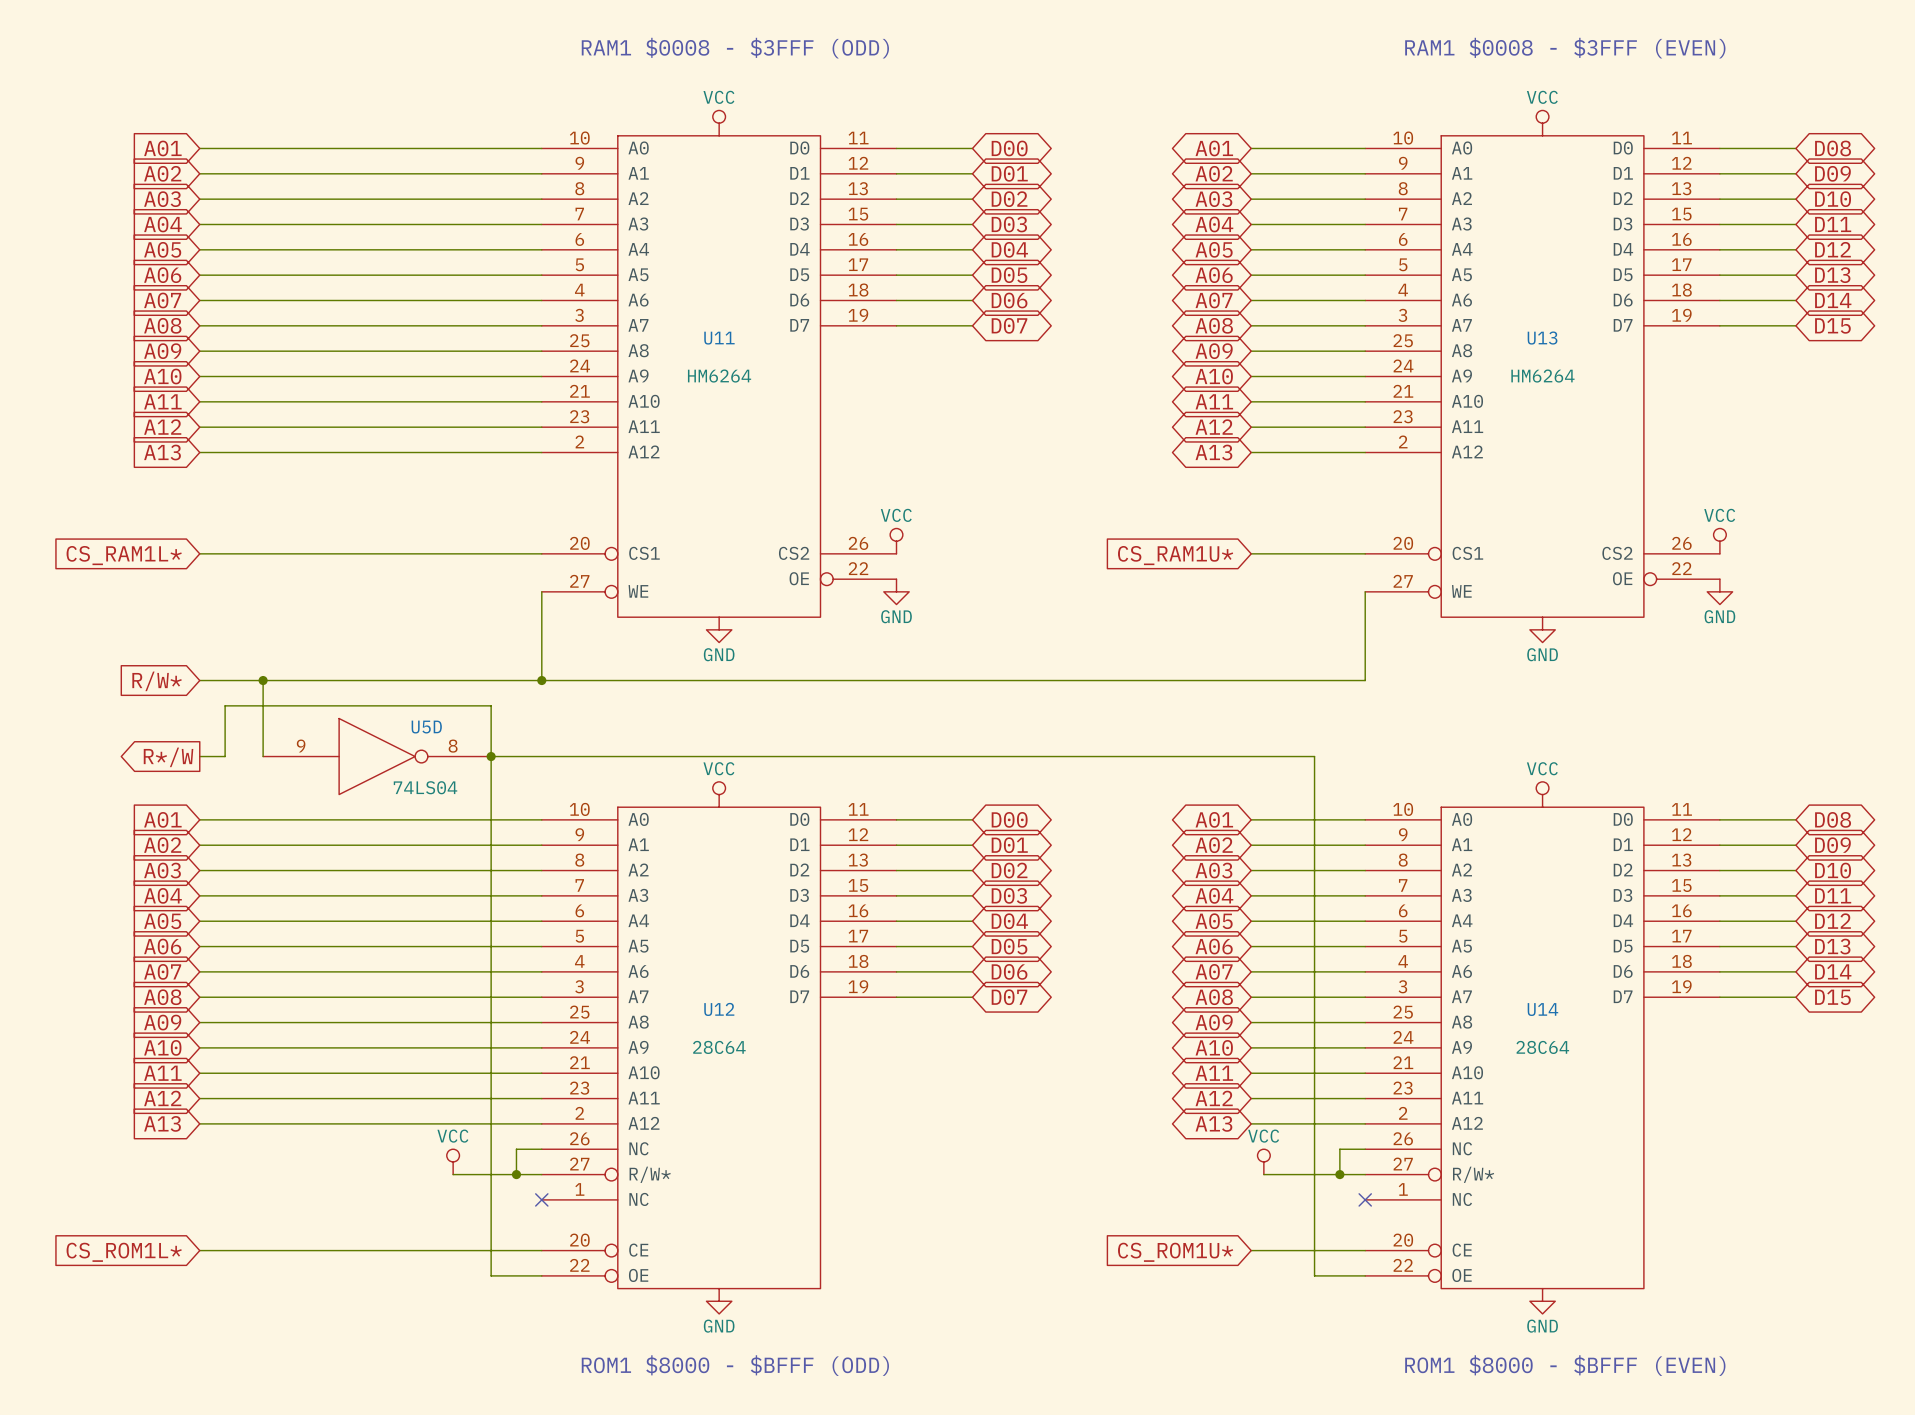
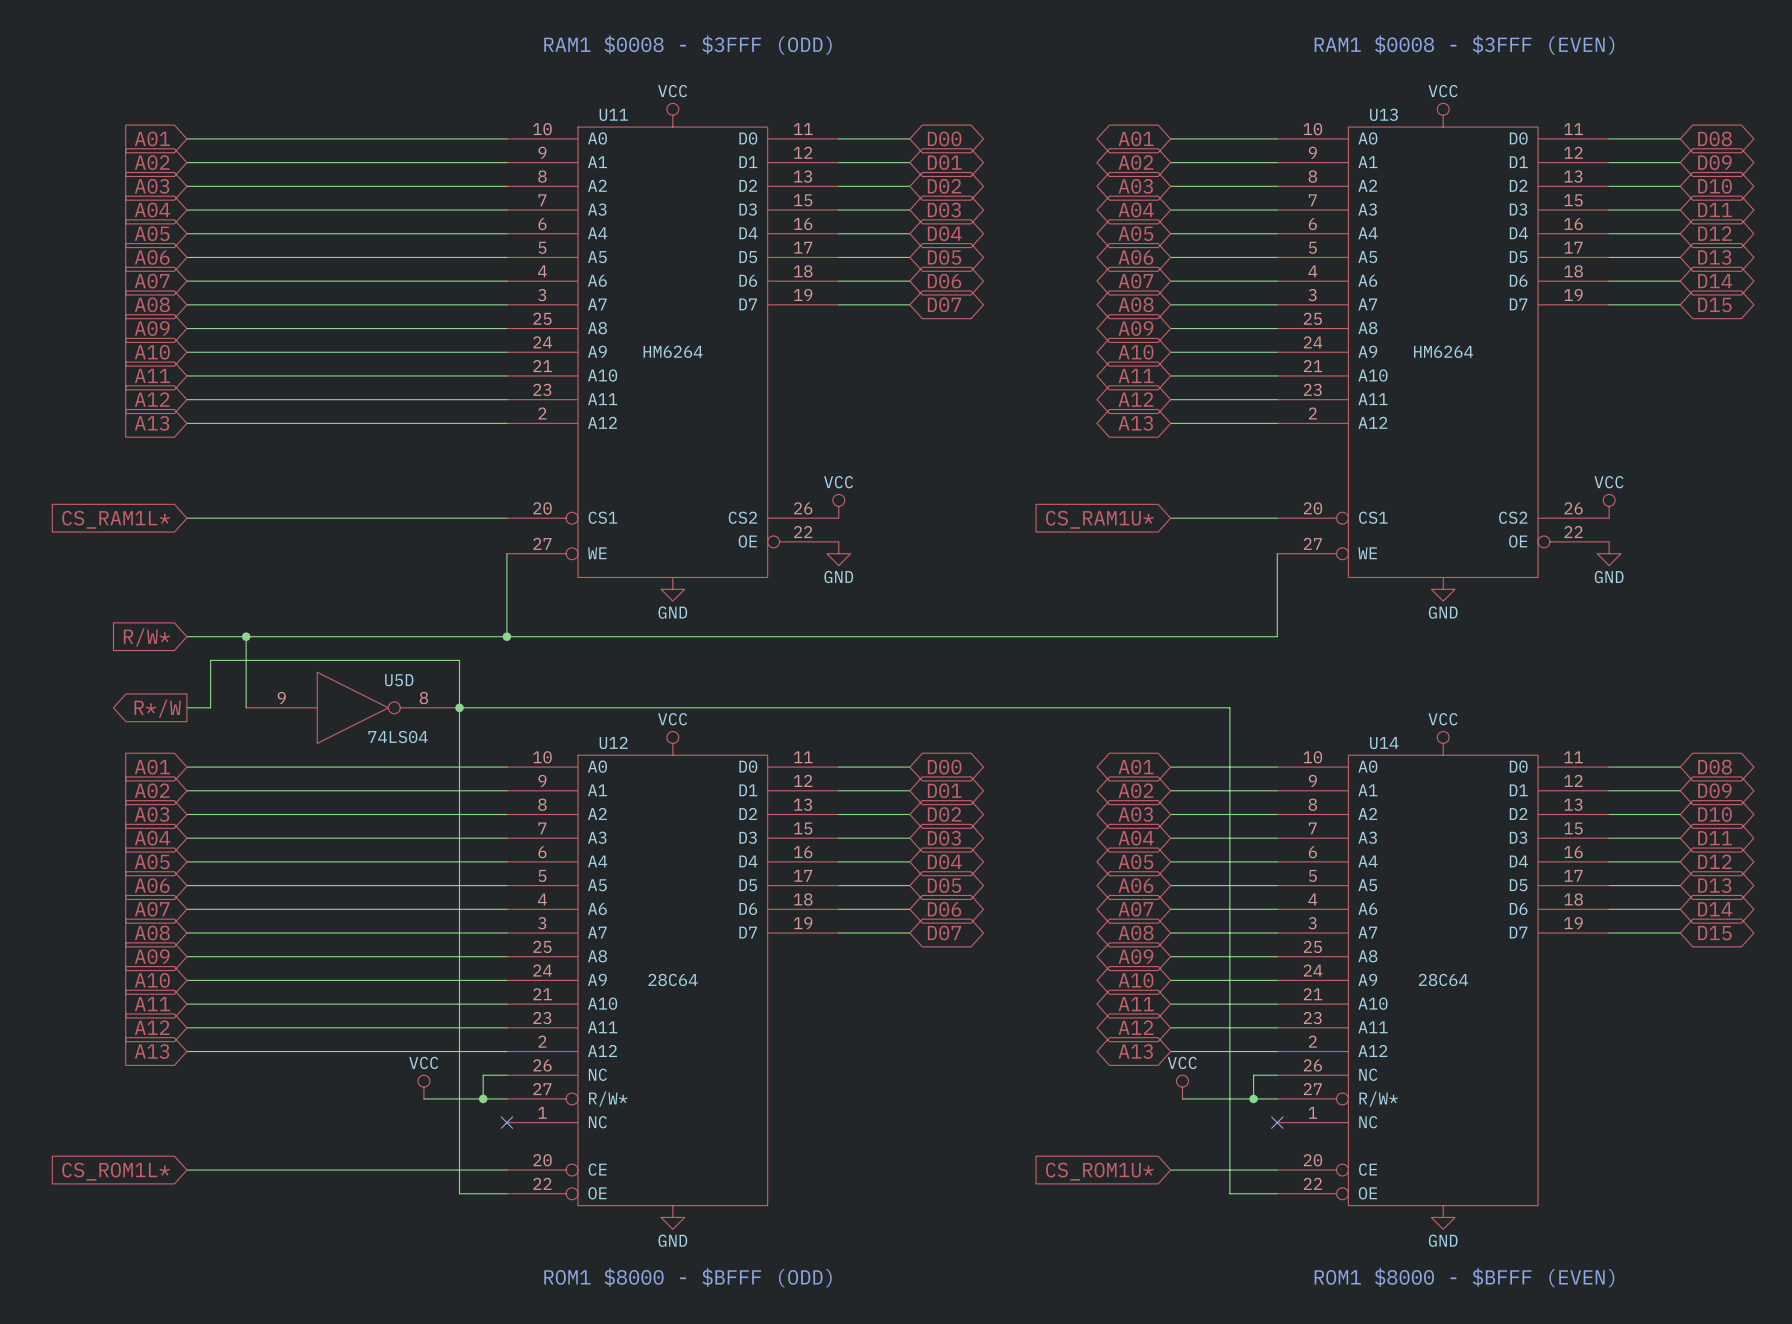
U11 name position: U11 (719, 338) -> U11 (613, 114)
U13 name position: U13 (1542, 338) -> U13 (1383, 114)
U12 name position: U12 (719, 1009) -> U12 (613, 742)
U14 name position: U14 (1542, 1009) -> U14 (1384, 743)

